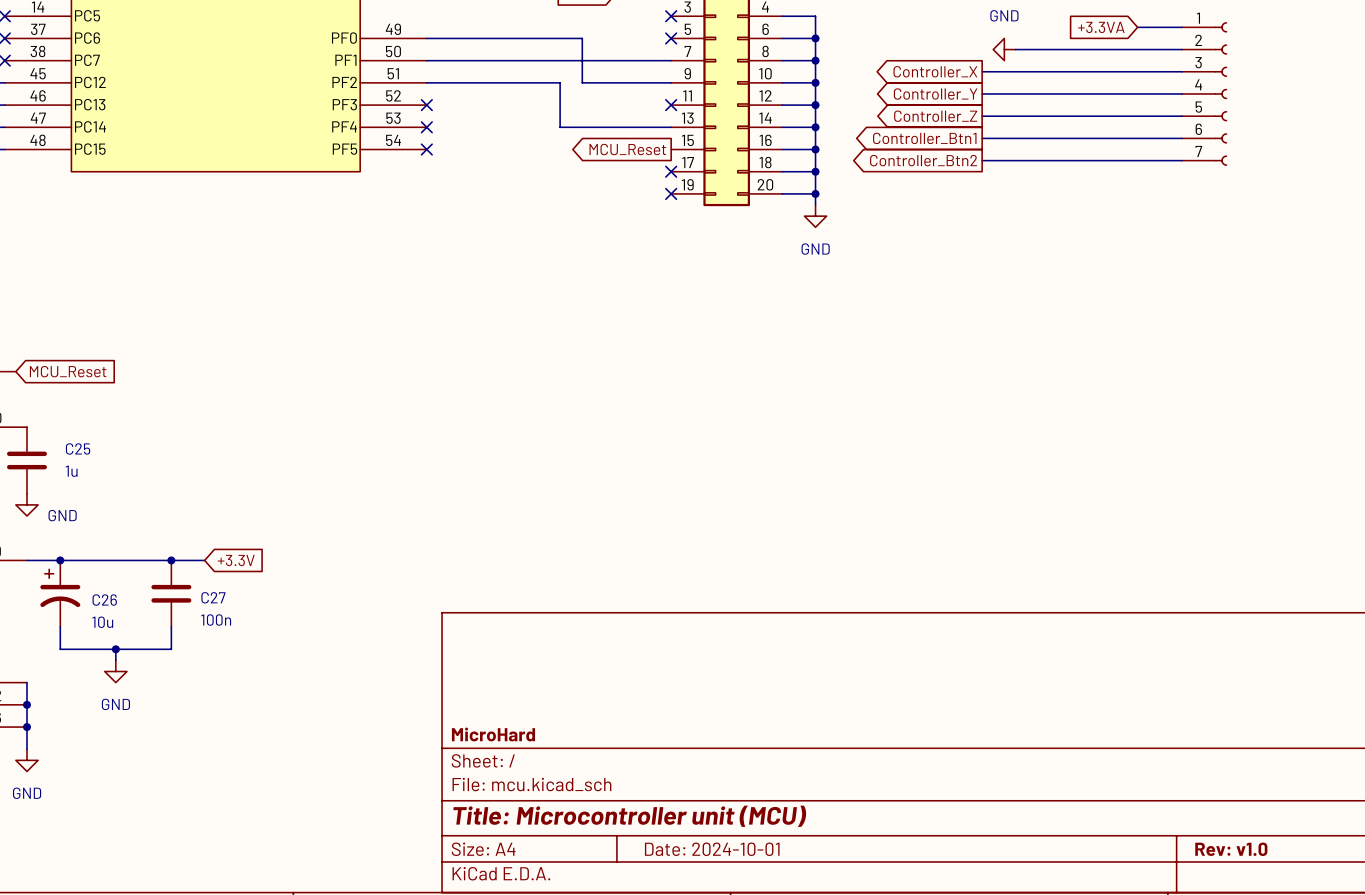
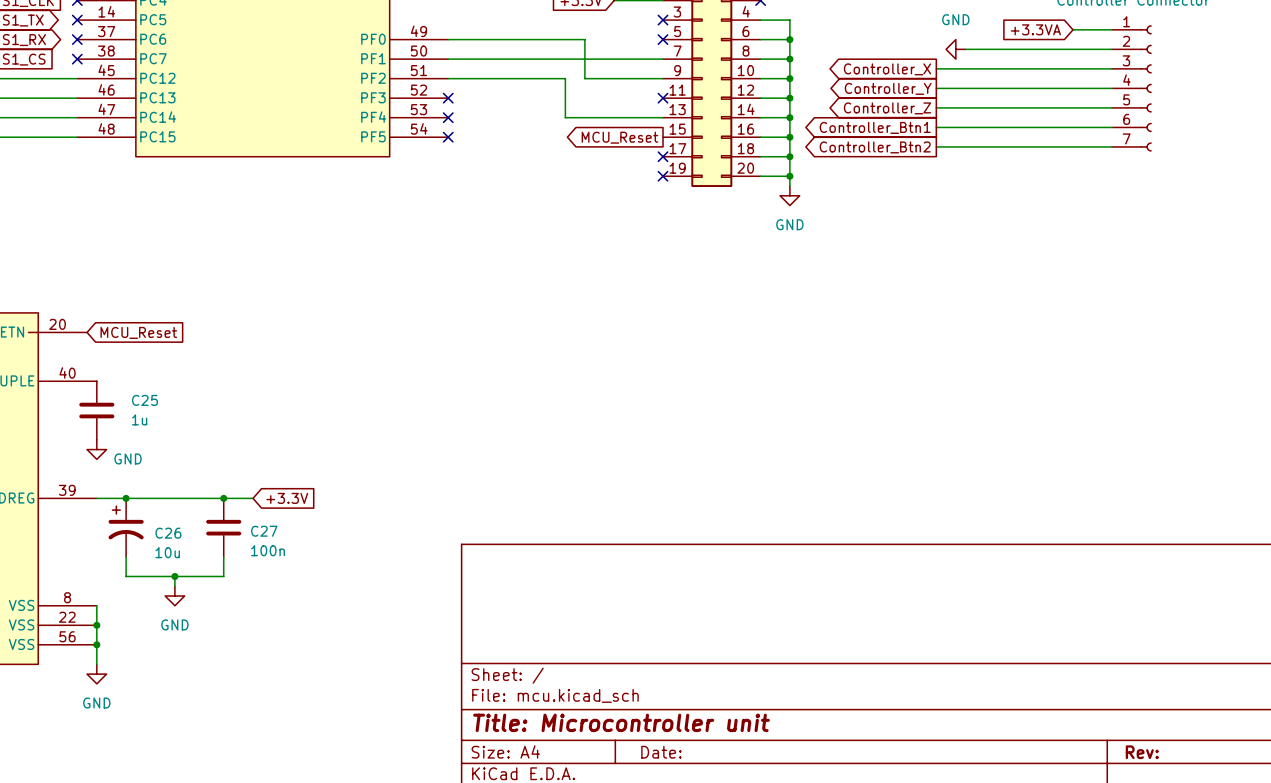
title block: MicroHard (493, 734) -> none
title block: Title: Microcontroller unit (MCU) (629, 816) -> Title: Microcontroller unit (621, 722)
title block: Date: 2024-10-01 (712, 849) -> Date: (661, 752)
title block: Rev: v1.0 (1231, 849) -> Rev: (1142, 752)

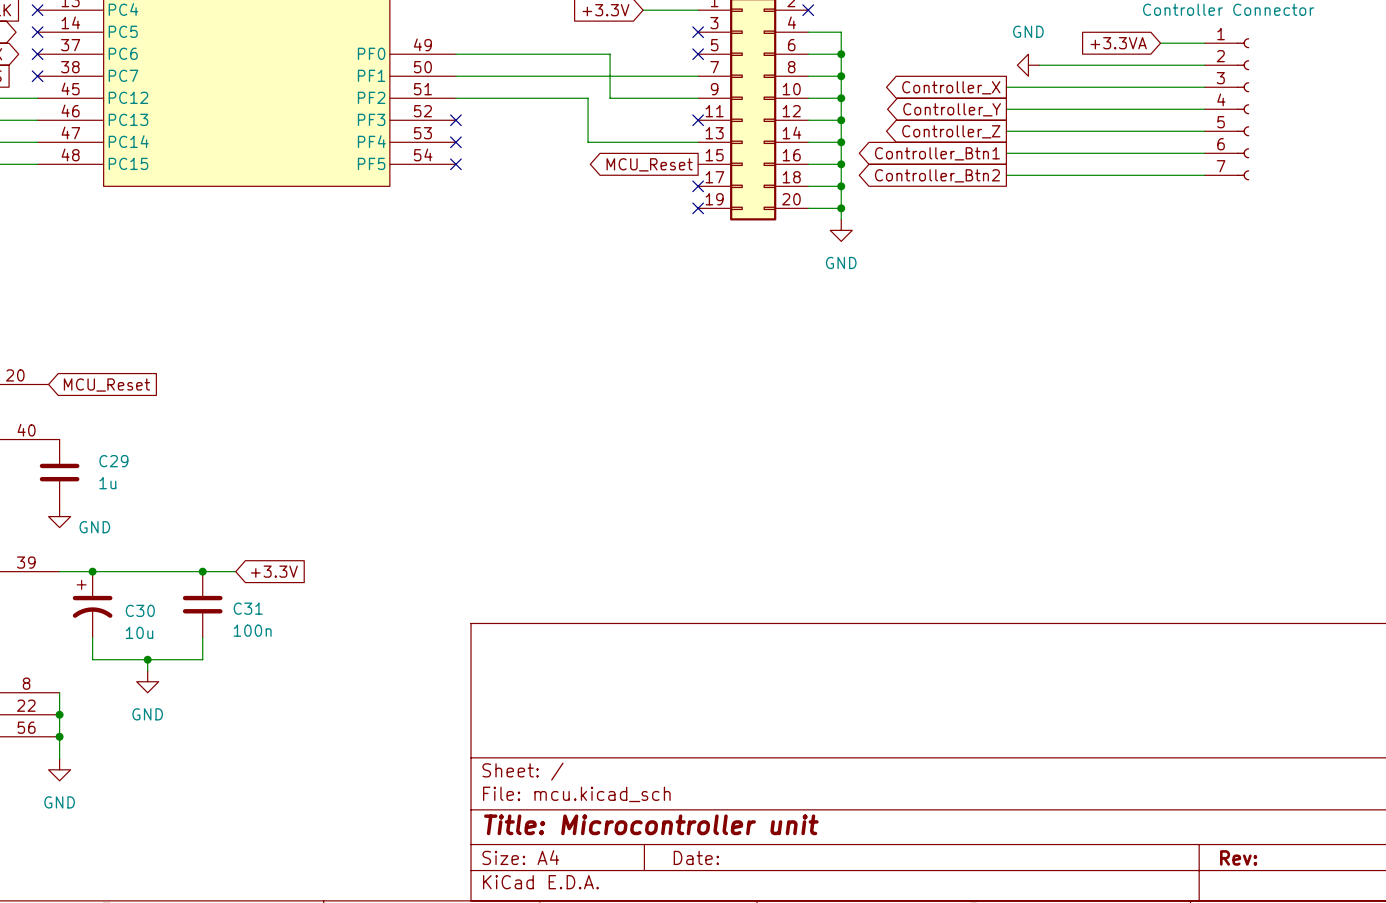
C25 name: C25 (144, 400) -> C29 (113, 461)
C27 name: C27 (264, 531) -> C31 (248, 608)
C26 name: C26 (168, 533) -> C30 (140, 610)

